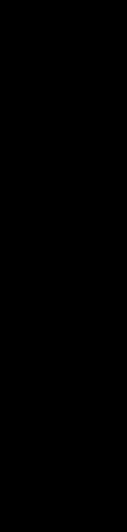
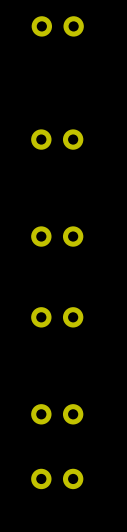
part: none -> (57, 26)
part: none -> (57, 139)
part: none -> (57, 236)
part: none -> (57, 317)
part: none -> (57, 414)
part: none -> (57, 478)

